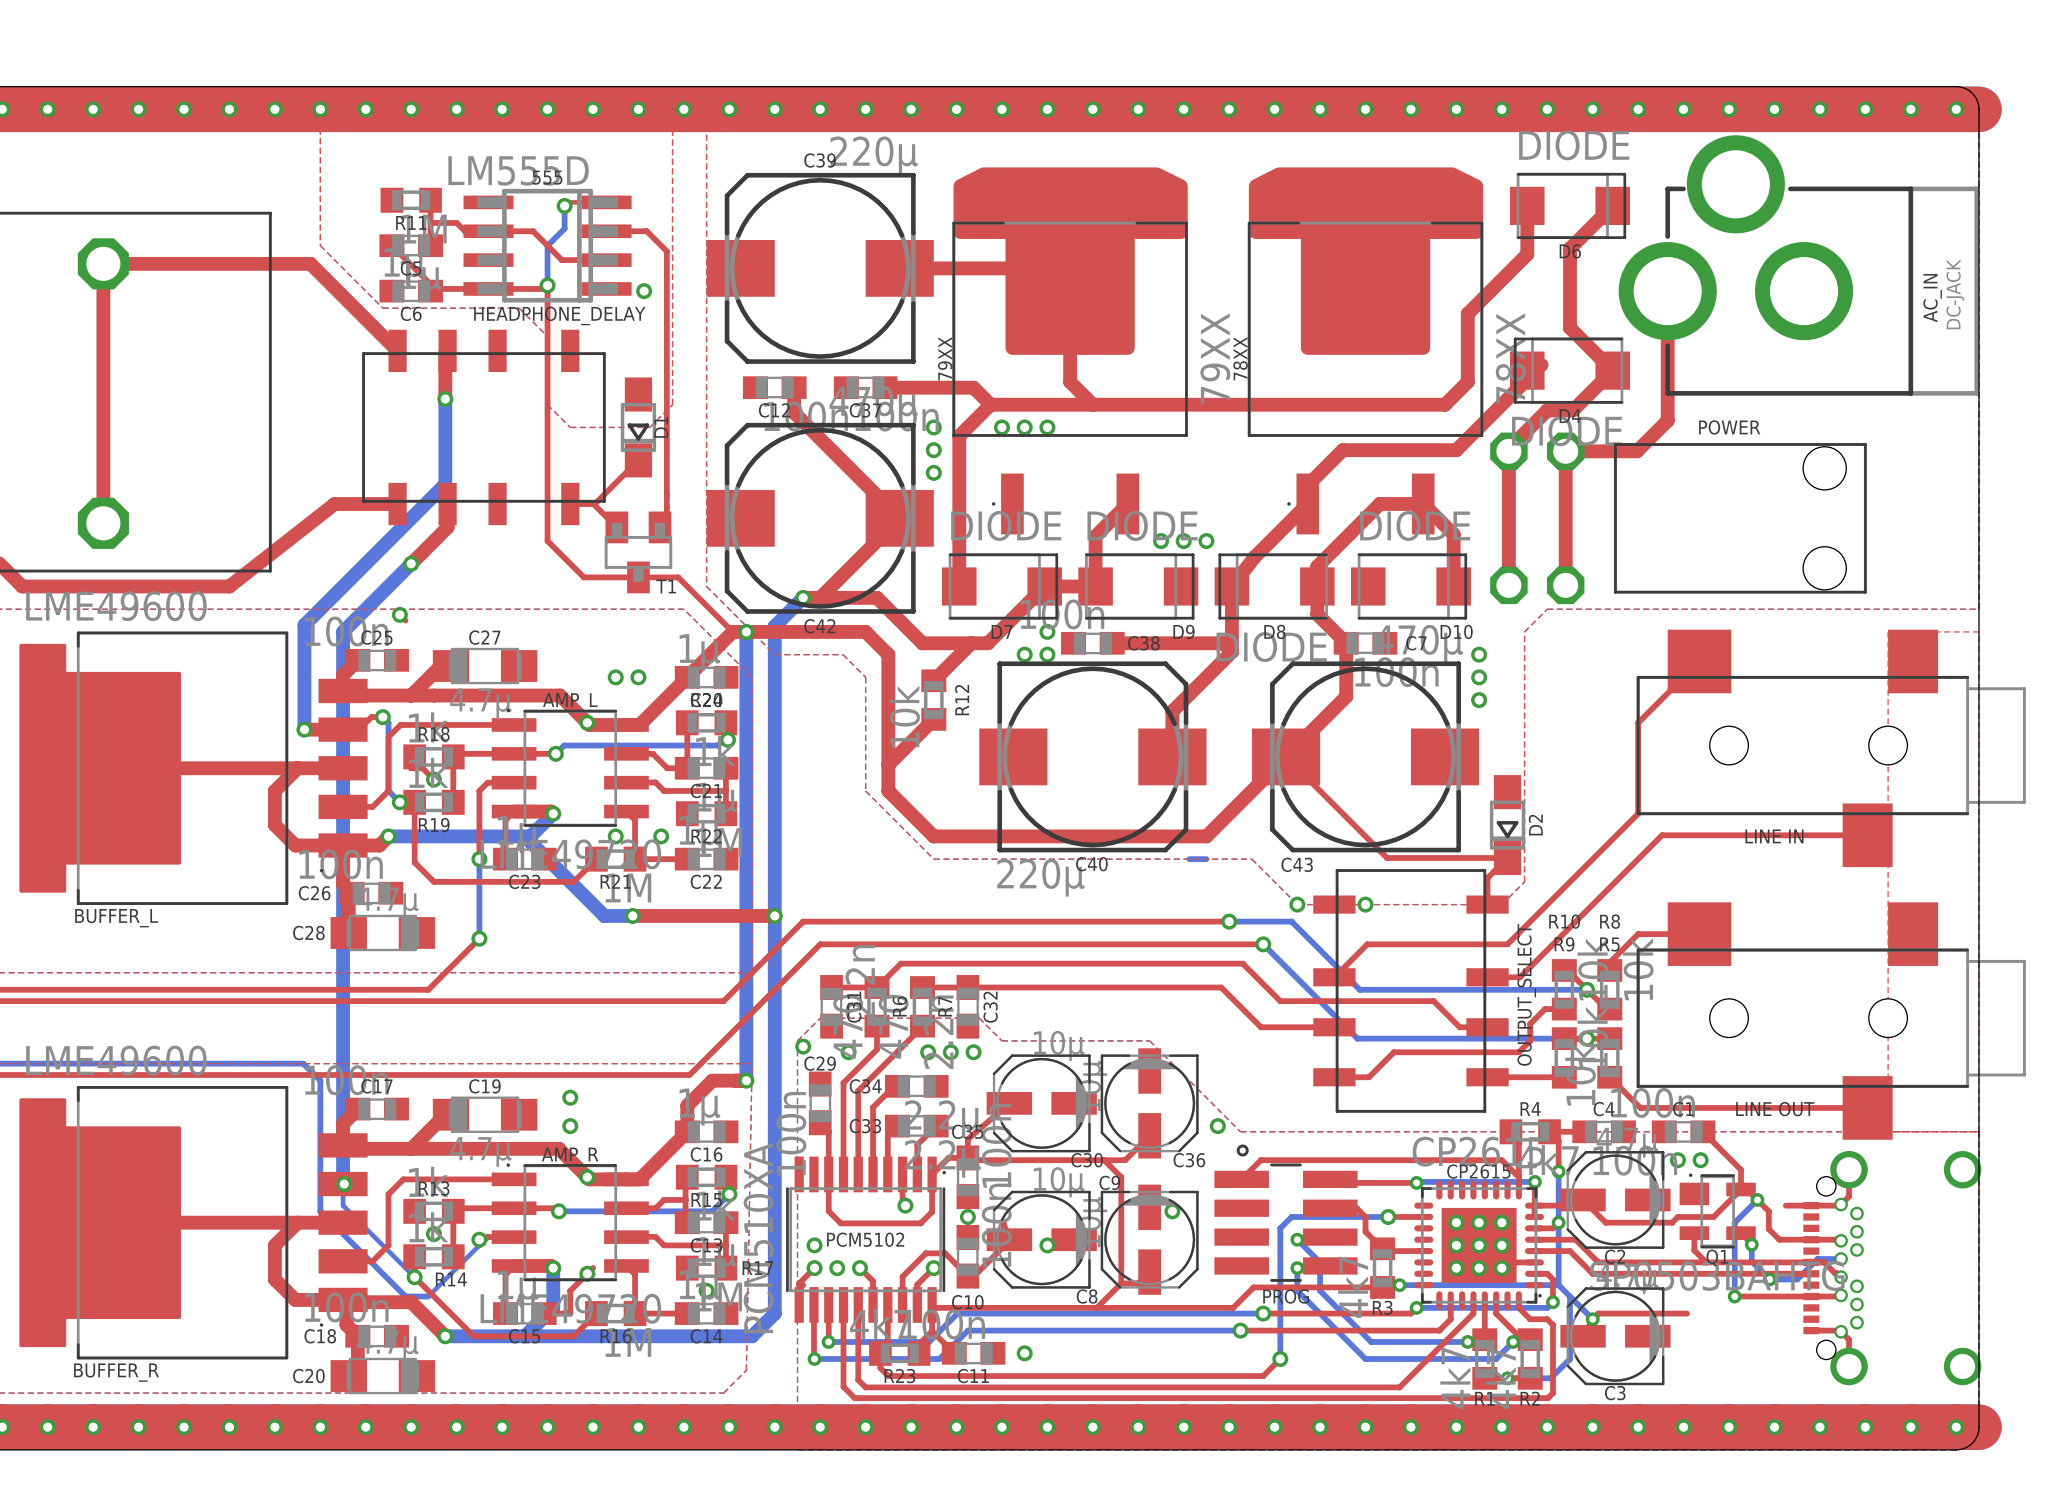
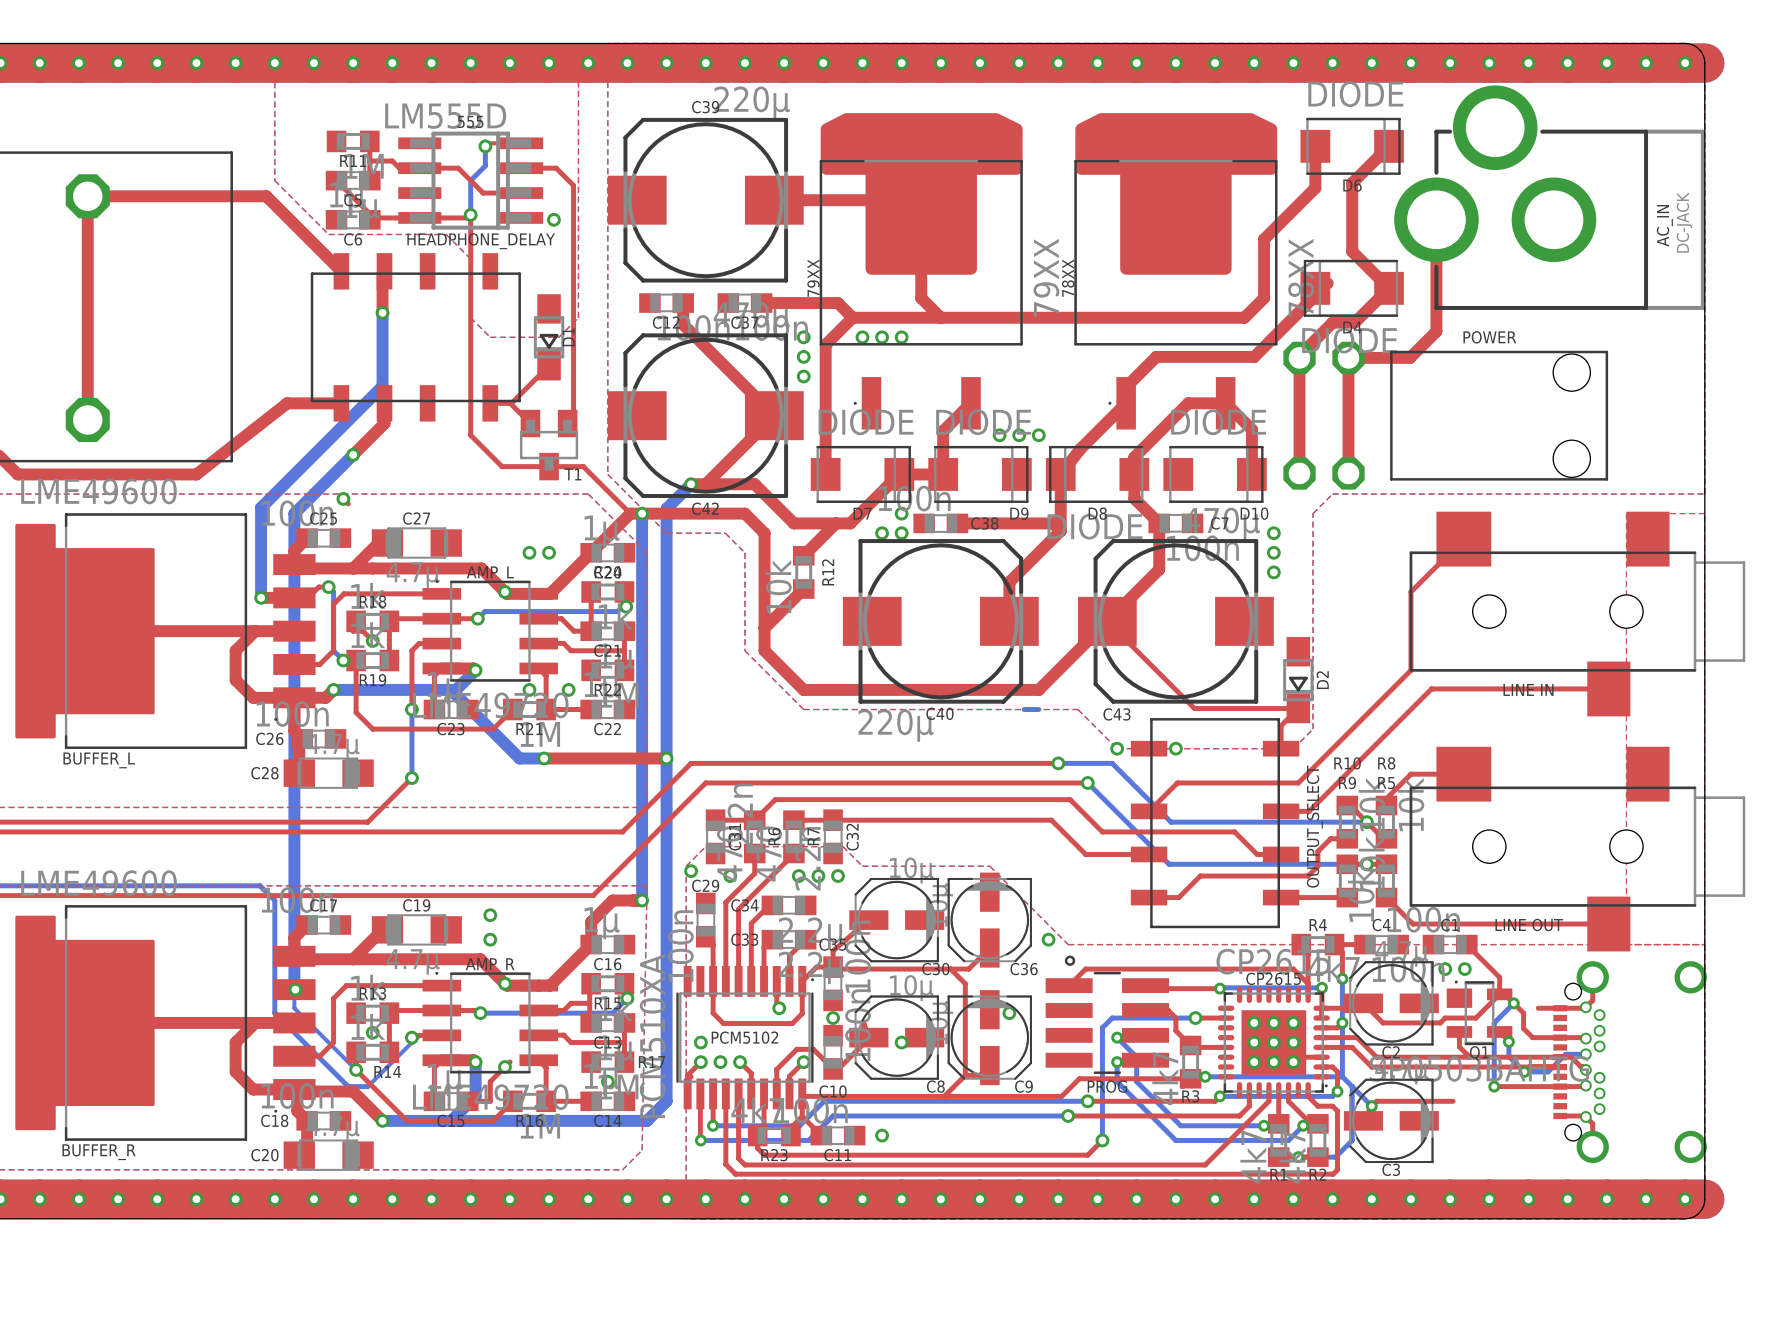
C9 name position: C9 (1109, 1182) -> C9 (1023, 1086)

